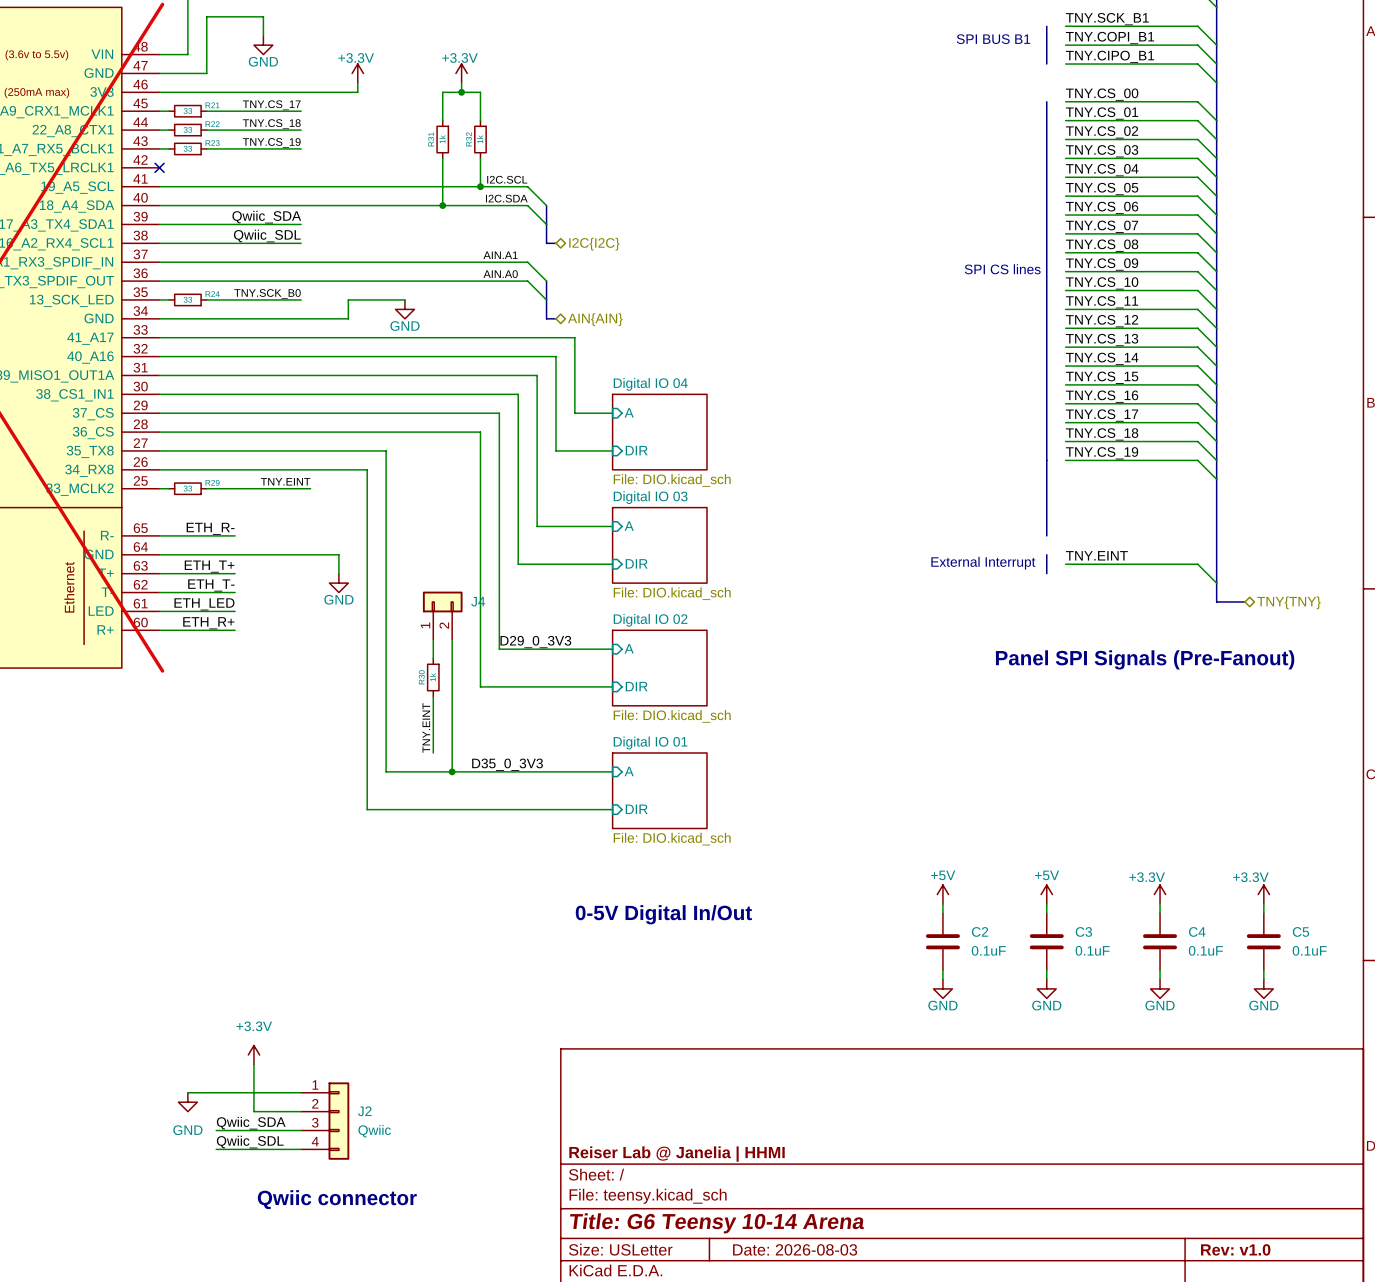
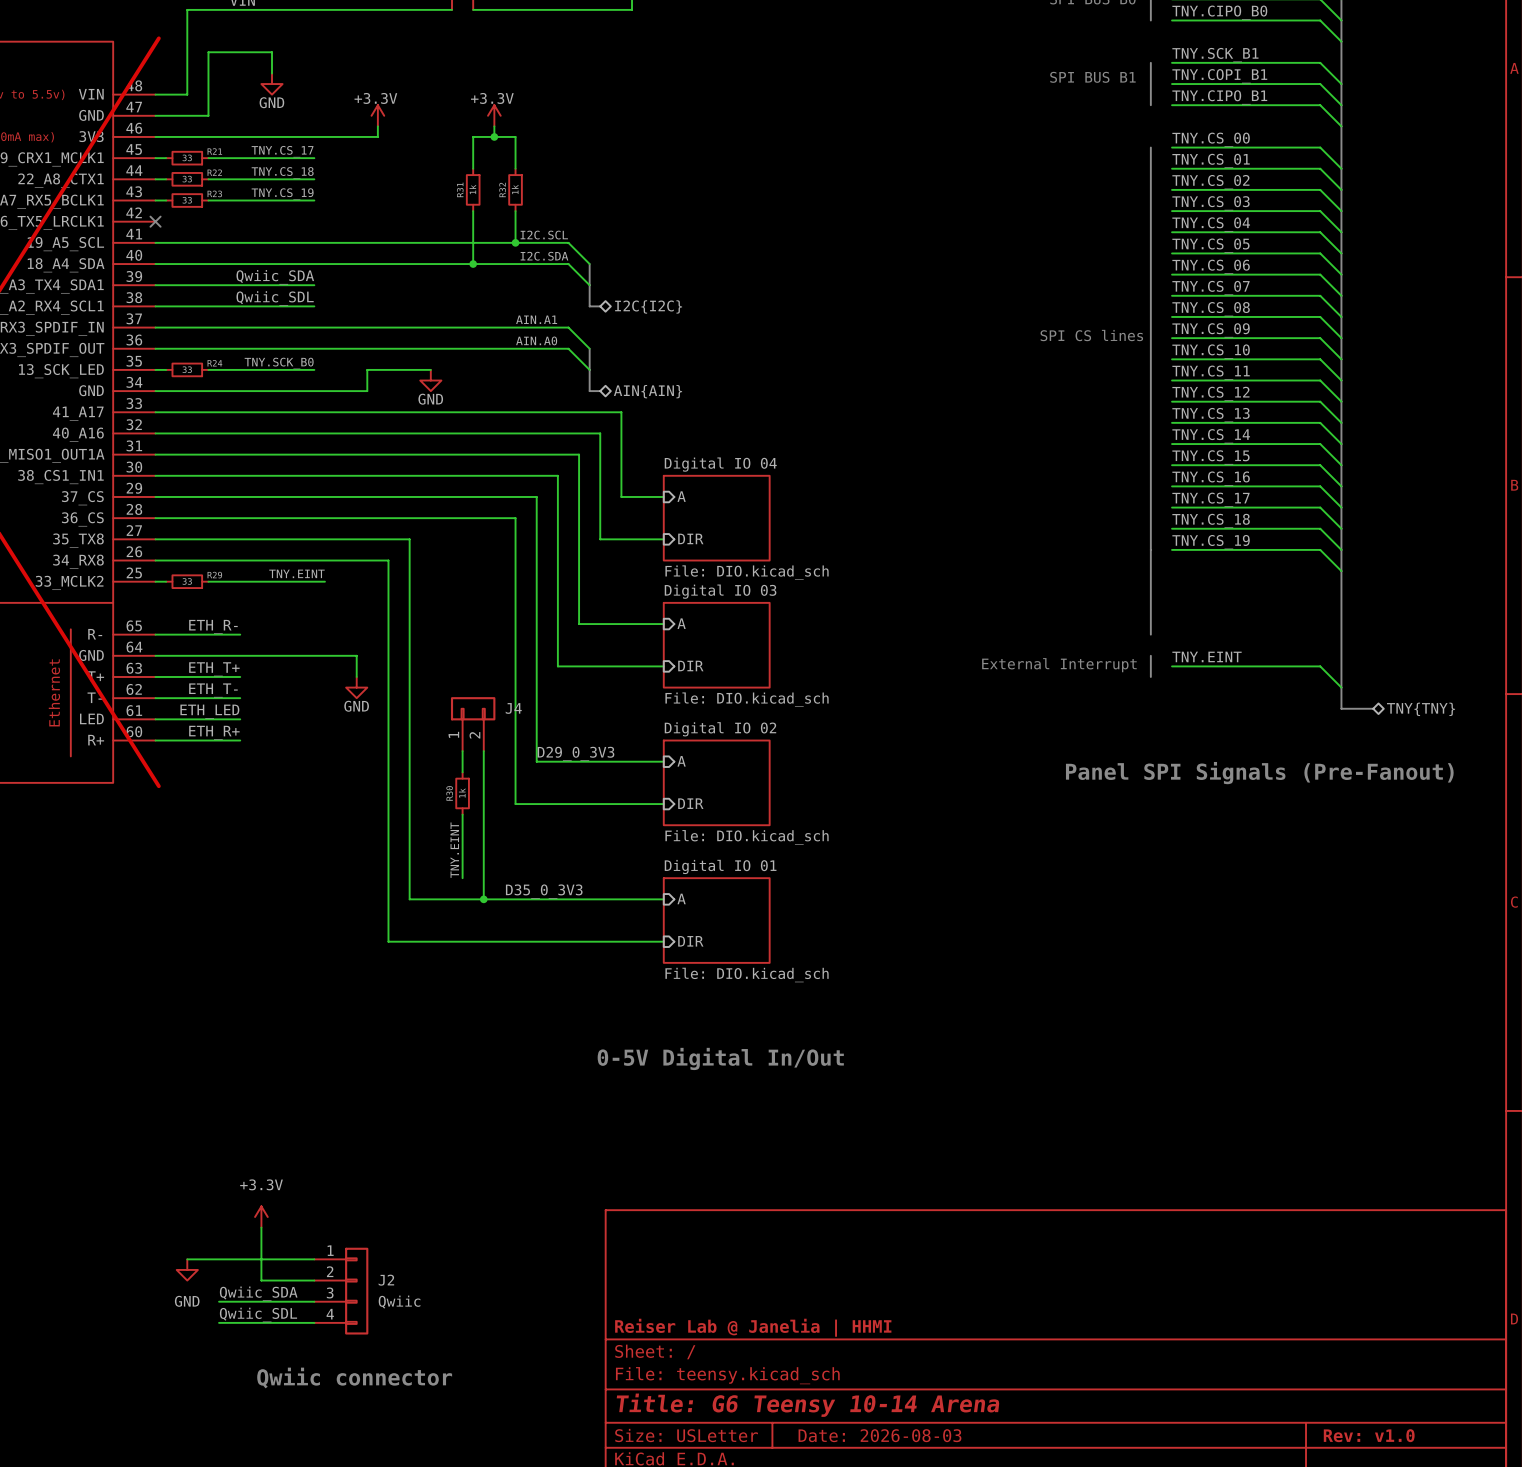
power symbol: +5V (942, 894) -> none
power symbol: +5V (1046, 894) -> none
power symbol: +3.3V (1160, 894) -> none
power symbol: +3.3V (1263, 894) -> none
wire: (942, 904) (942, 913) -> none
wire: (1046, 904) (1046, 913) -> none
wire: (1160, 904) (1160, 913) -> none
wire: (1263, 904) (1263, 913) -> none
C2: 0.1uF (942, 941) -> none
C3: 0.1uF (1046, 941) -> none
C4: 0.1uF (1160, 941) -> none
C5: 0.1uF (1263, 941) -> none
wire: (942, 970) (942, 979) -> none
wire: (1046, 970) (1046, 979) -> none
wire: (1160, 970) (1160, 979) -> none
wire: (1263, 970) (1263, 979) -> none
power symbol: GND (942, 988) -> none
power symbol: GND (1046, 988) -> none
power symbol: GND (1160, 988) -> none
power symbol: GND (1263, 988) -> none

